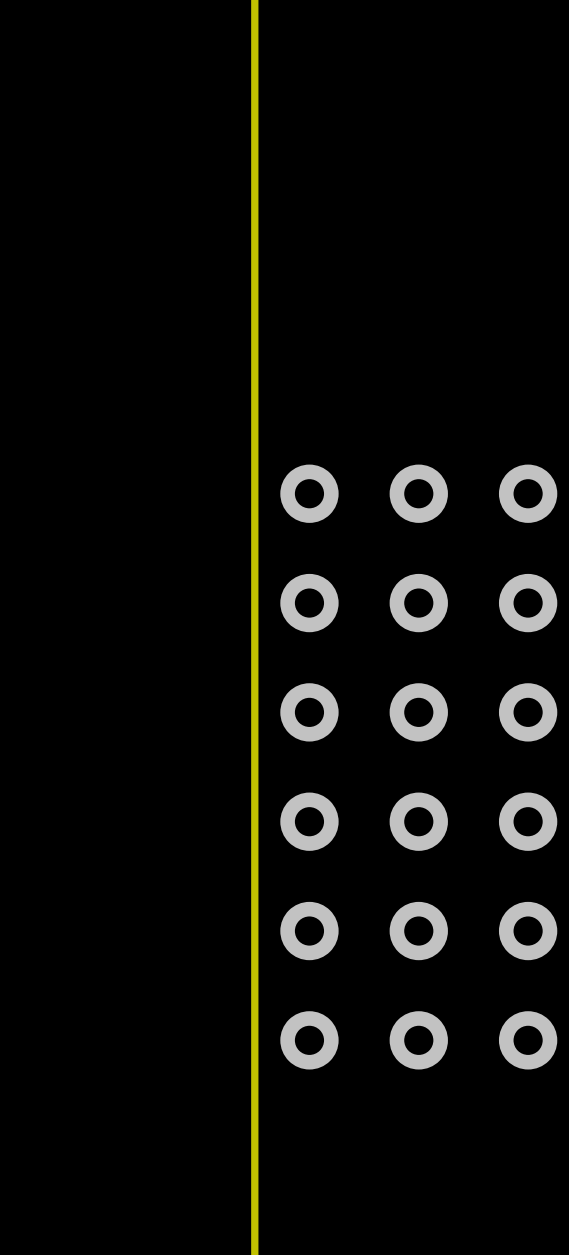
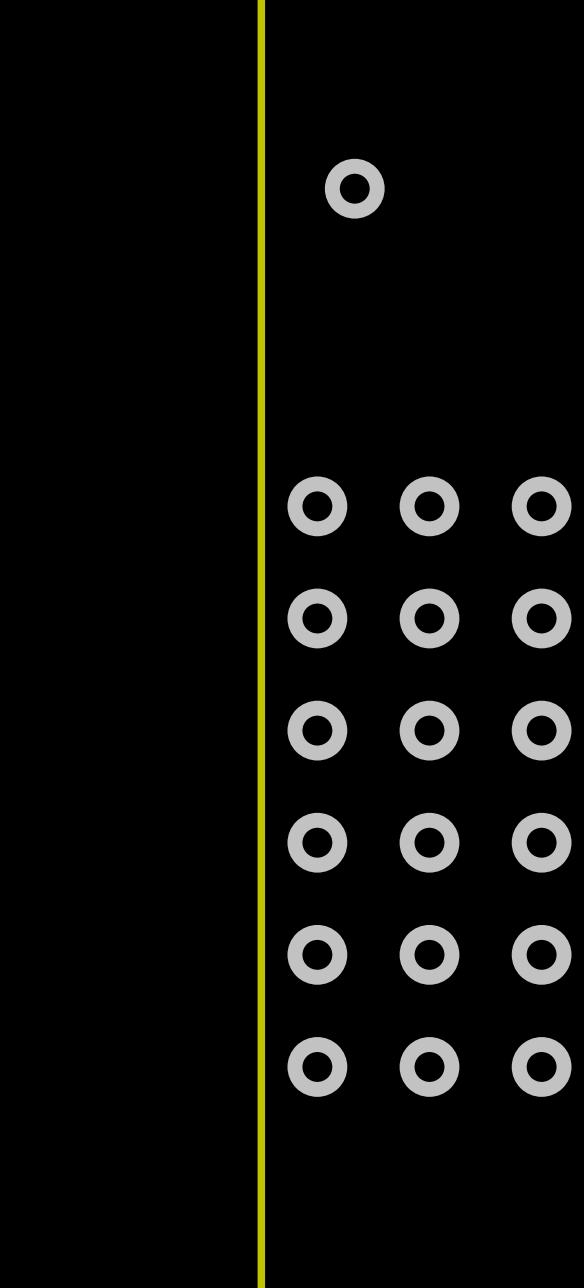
via: none -> (354, 188)

